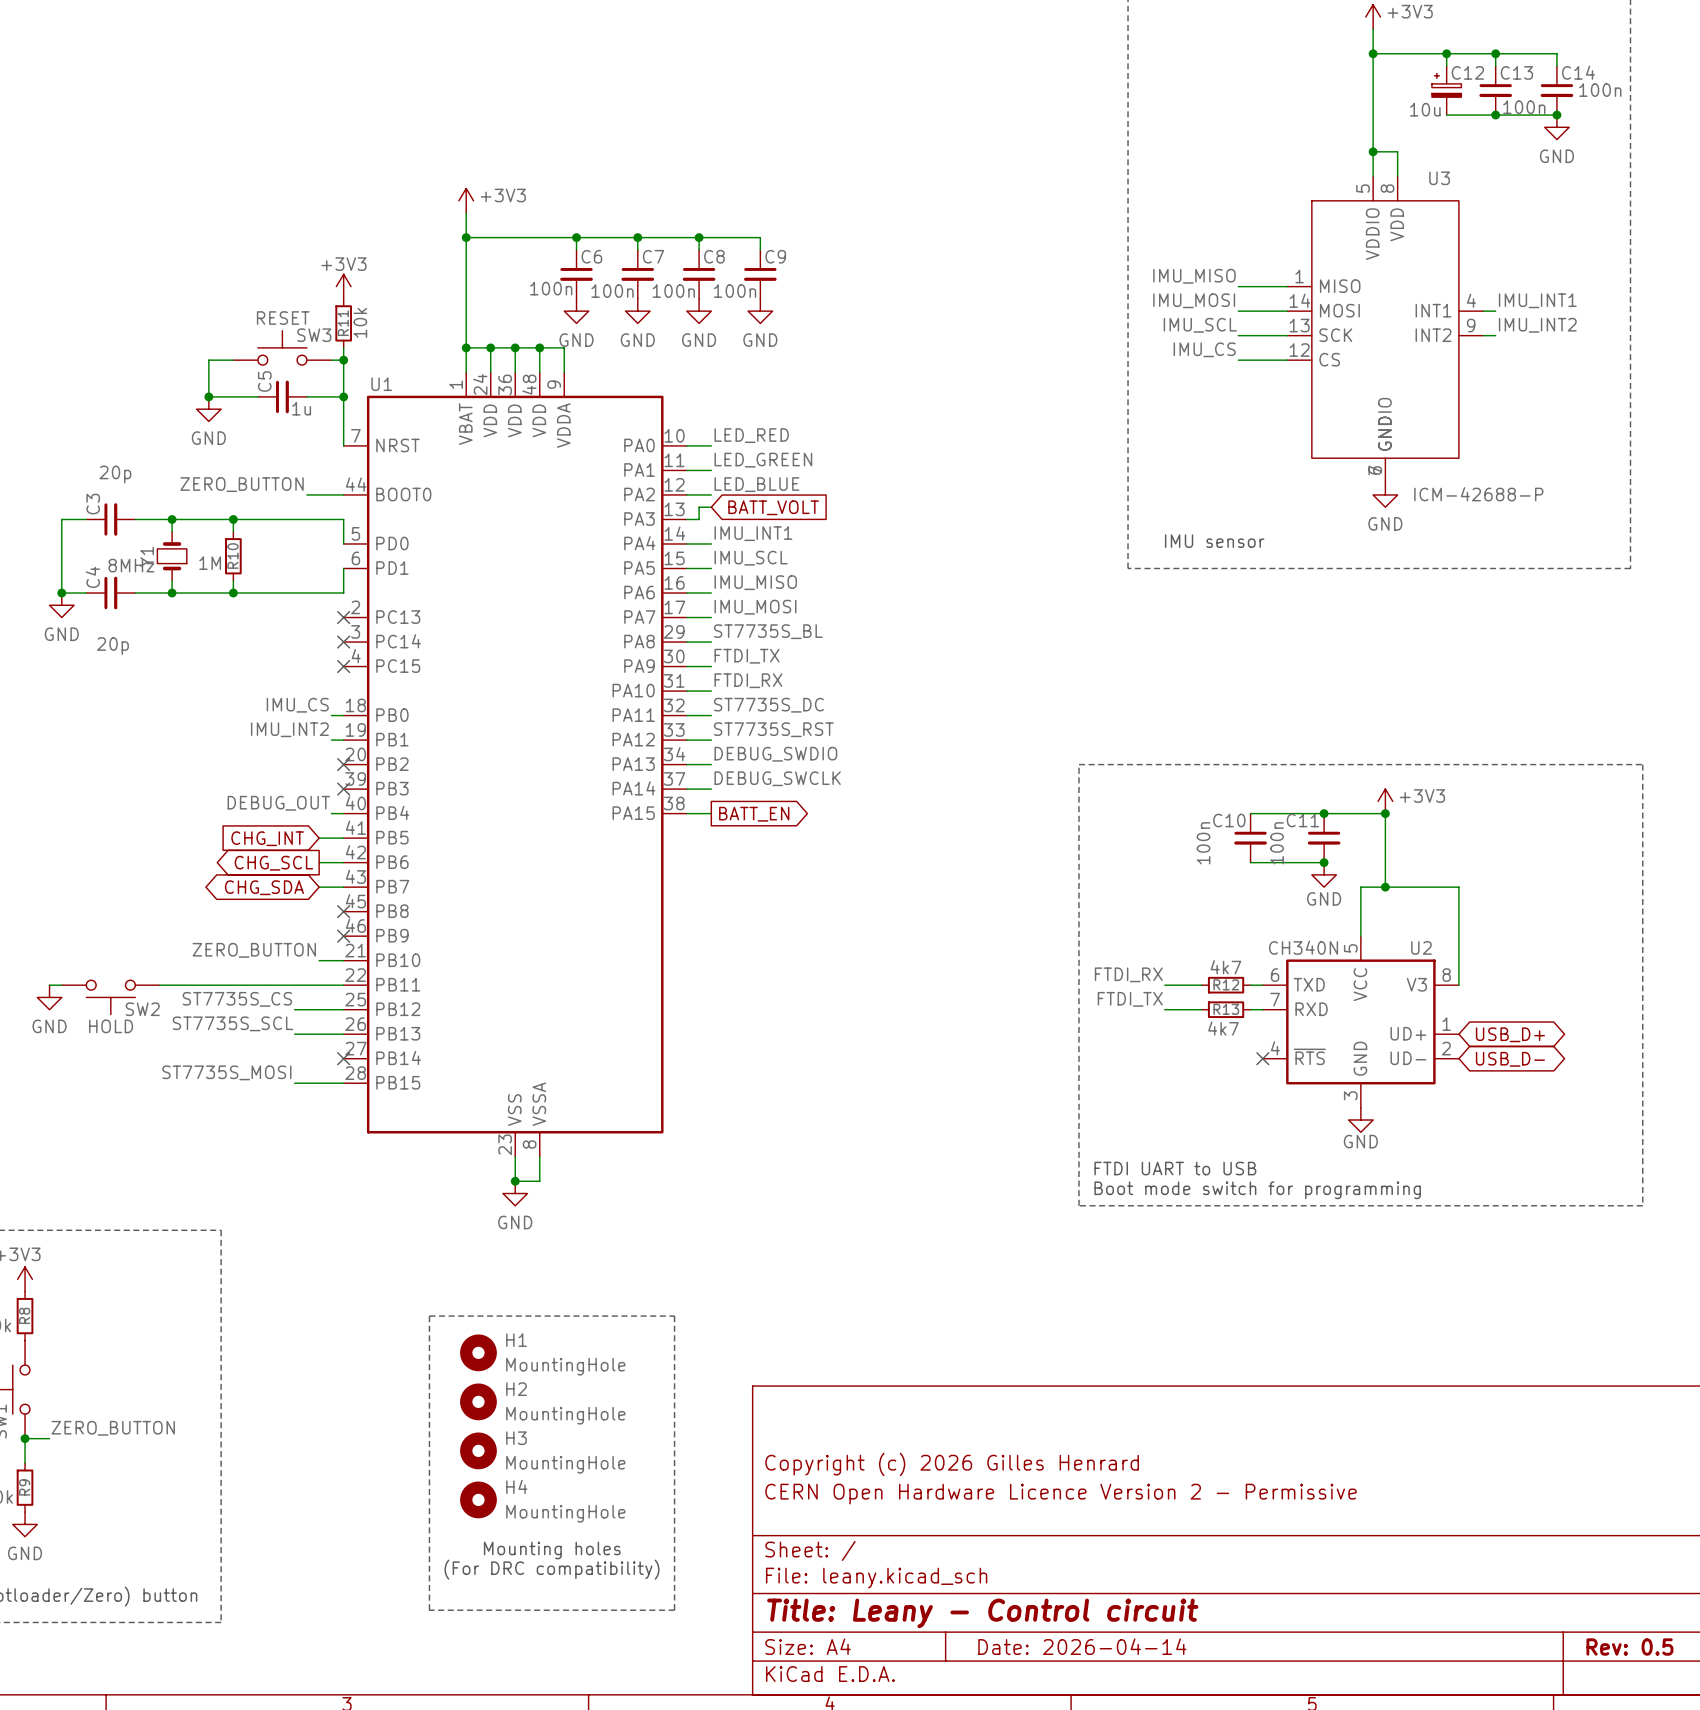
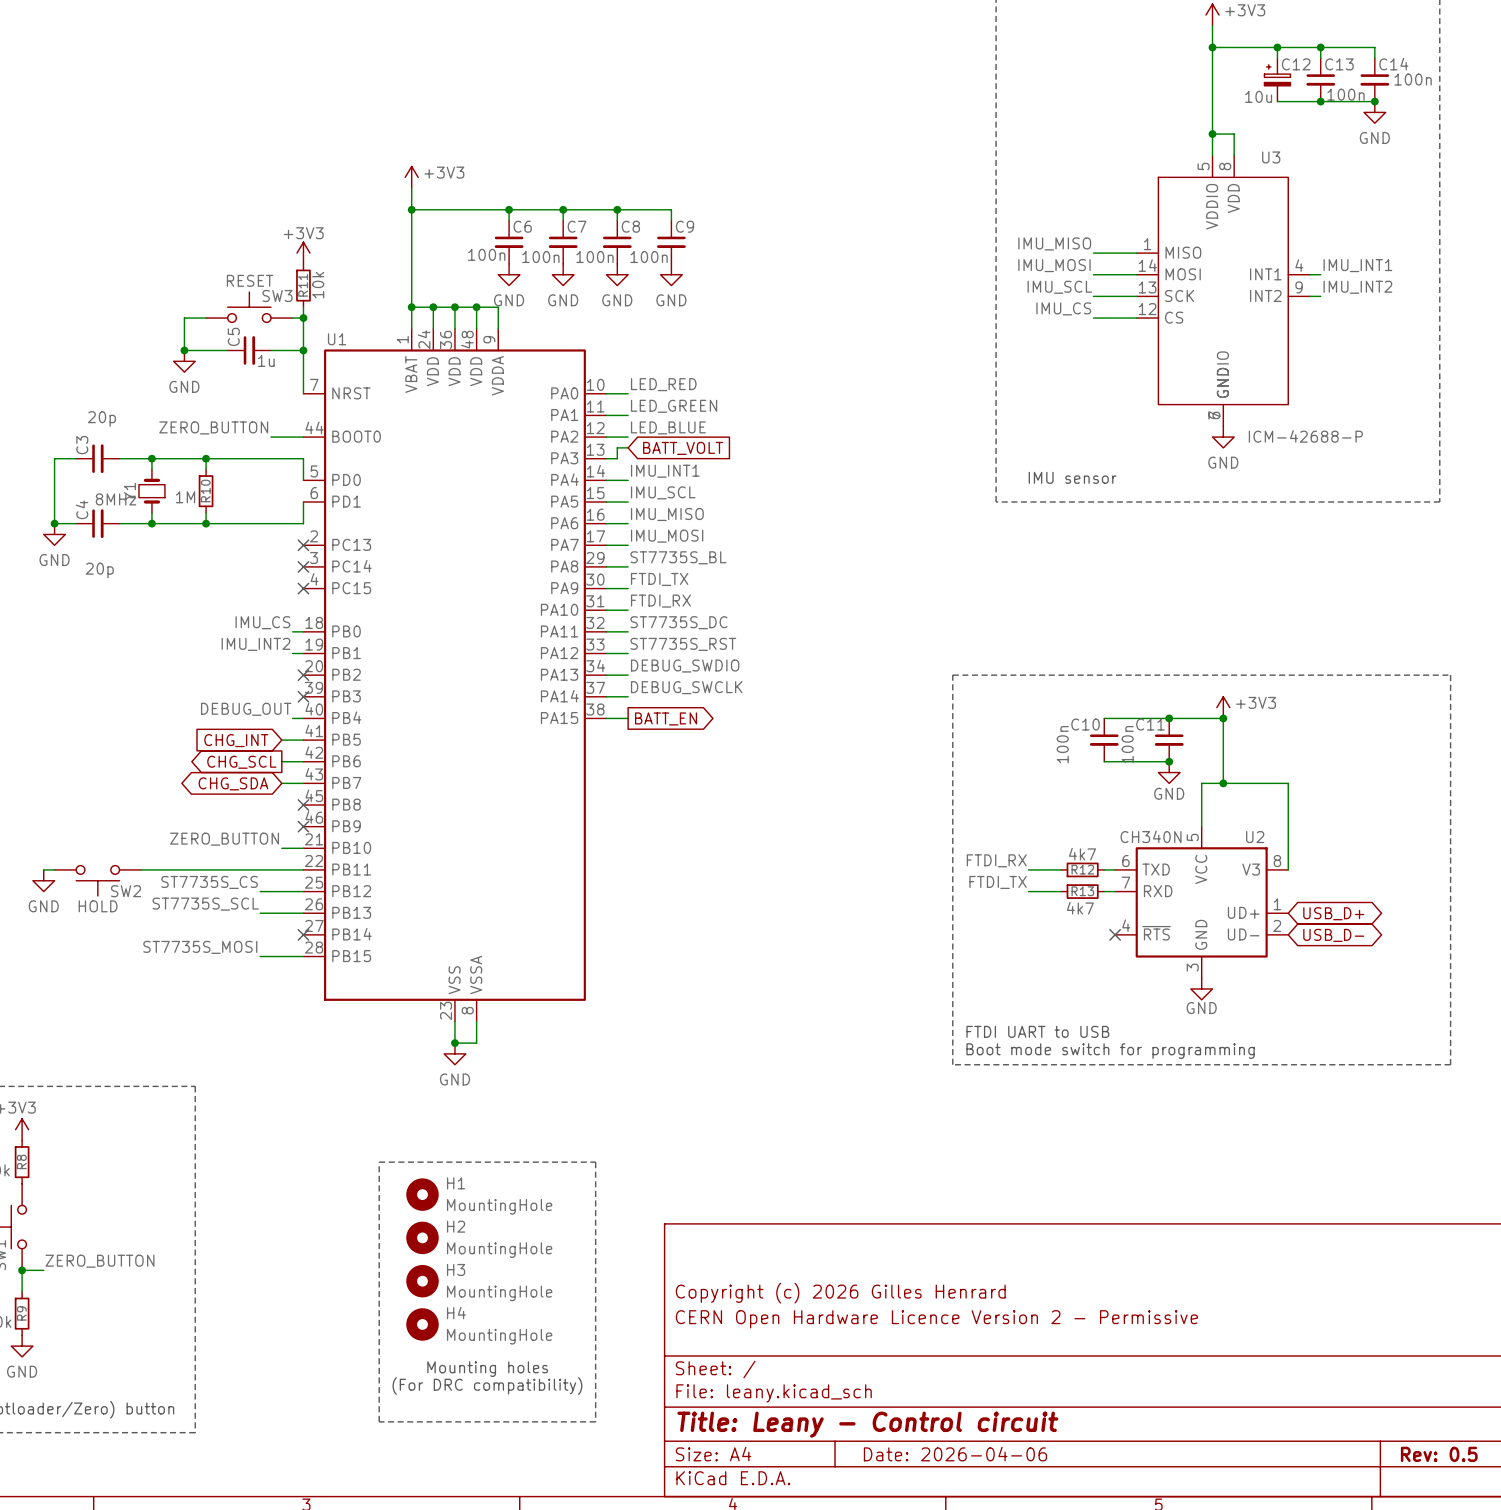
title block: Date: 2026-04-14 (1082, 1646) -> Date: 2026-04-06 (955, 1454)

